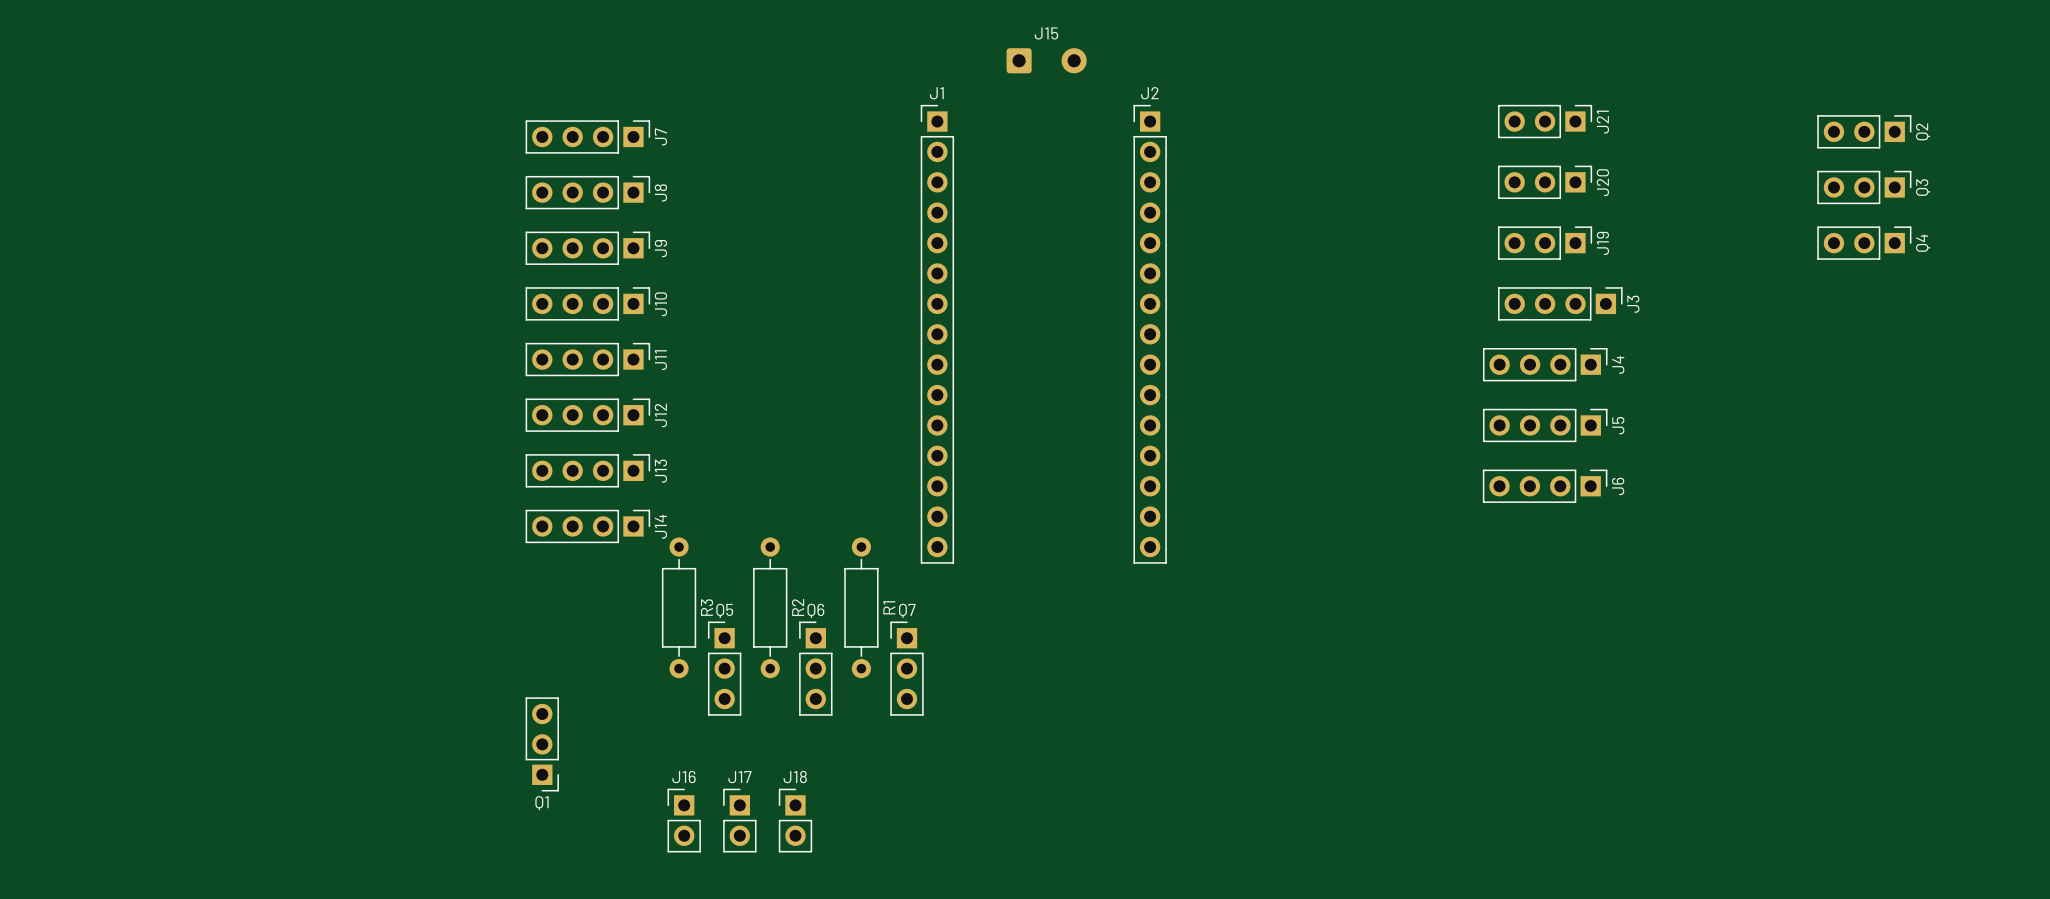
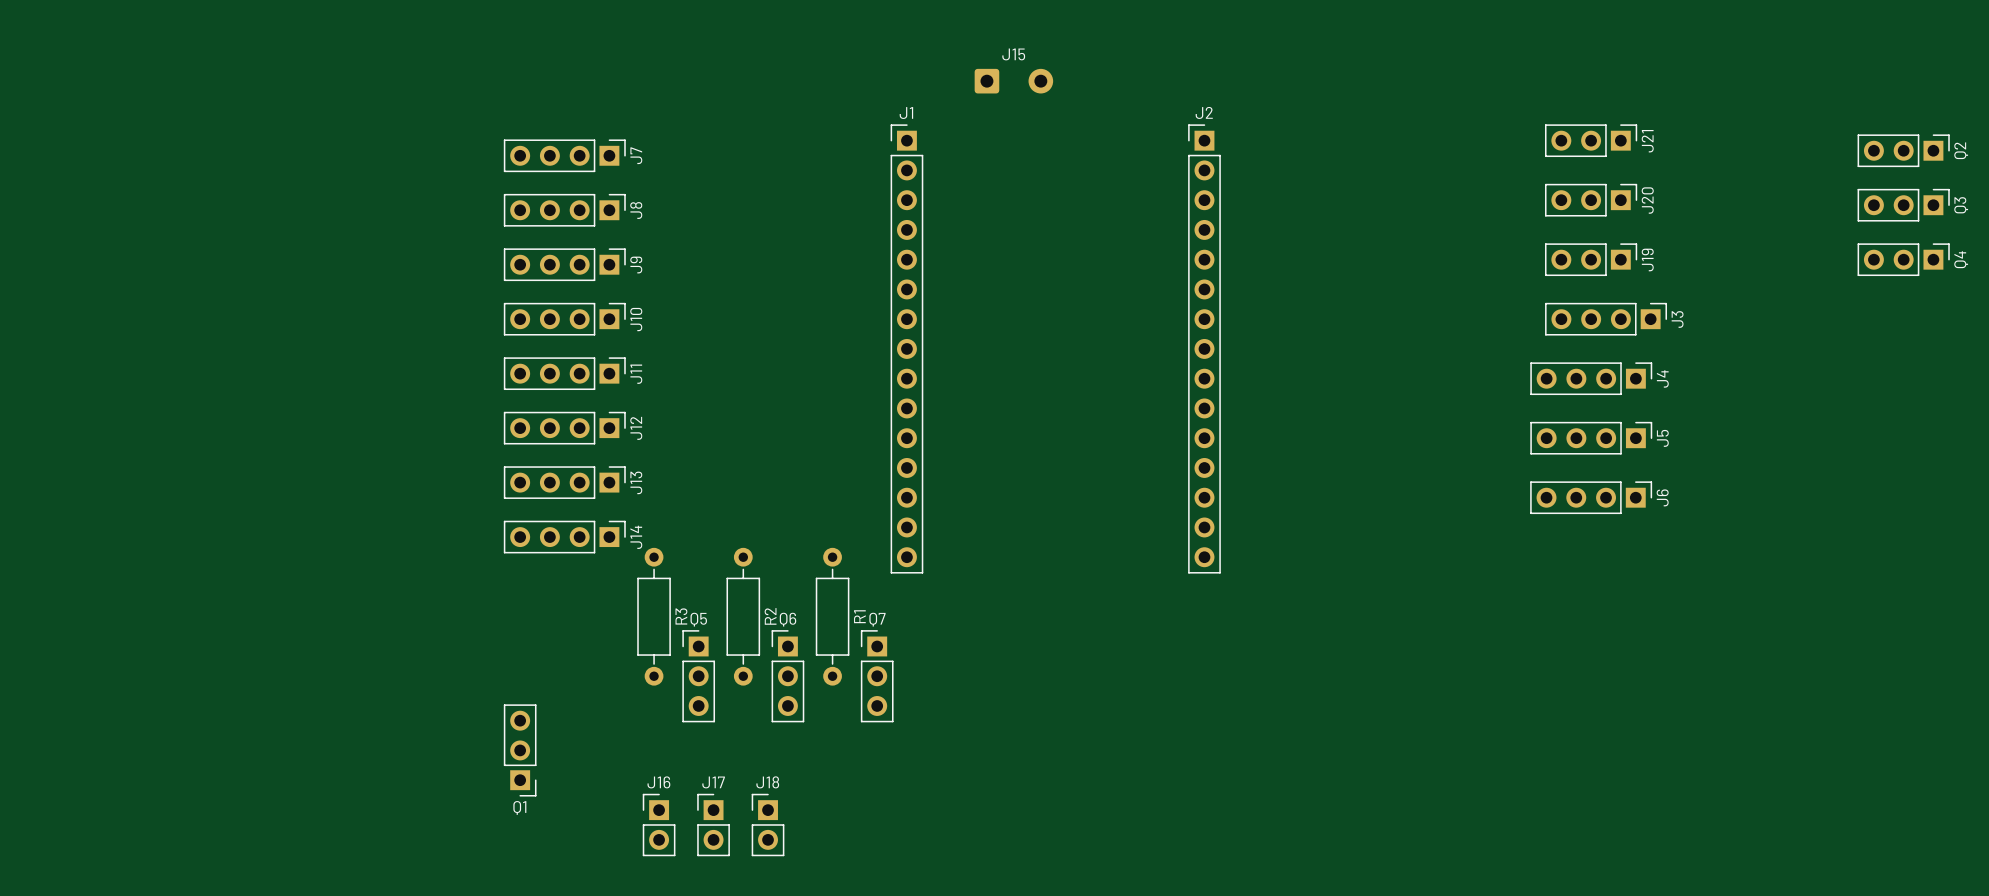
J21 position: (1545, 121) -> (1591, 140)
Q2 position: (1864, 131) -> (1903, 150)
J20 position: (1545, 182) -> (1591, 200)
Q3 position: (1864, 187) -> (1903, 205)
J19 position: (1545, 243) -> (1591, 259)
Q4 position: (1864, 243) -> (1903, 259)
J3 position: (1560, 303) -> (1606, 319)
J2 position: (1150, 334) -> (1204, 348)
J4 position: (1545, 364) -> (1591, 378)
J5 position: (1545, 425) -> (1591, 438)
J6 position: (1545, 486) -> (1591, 497)

